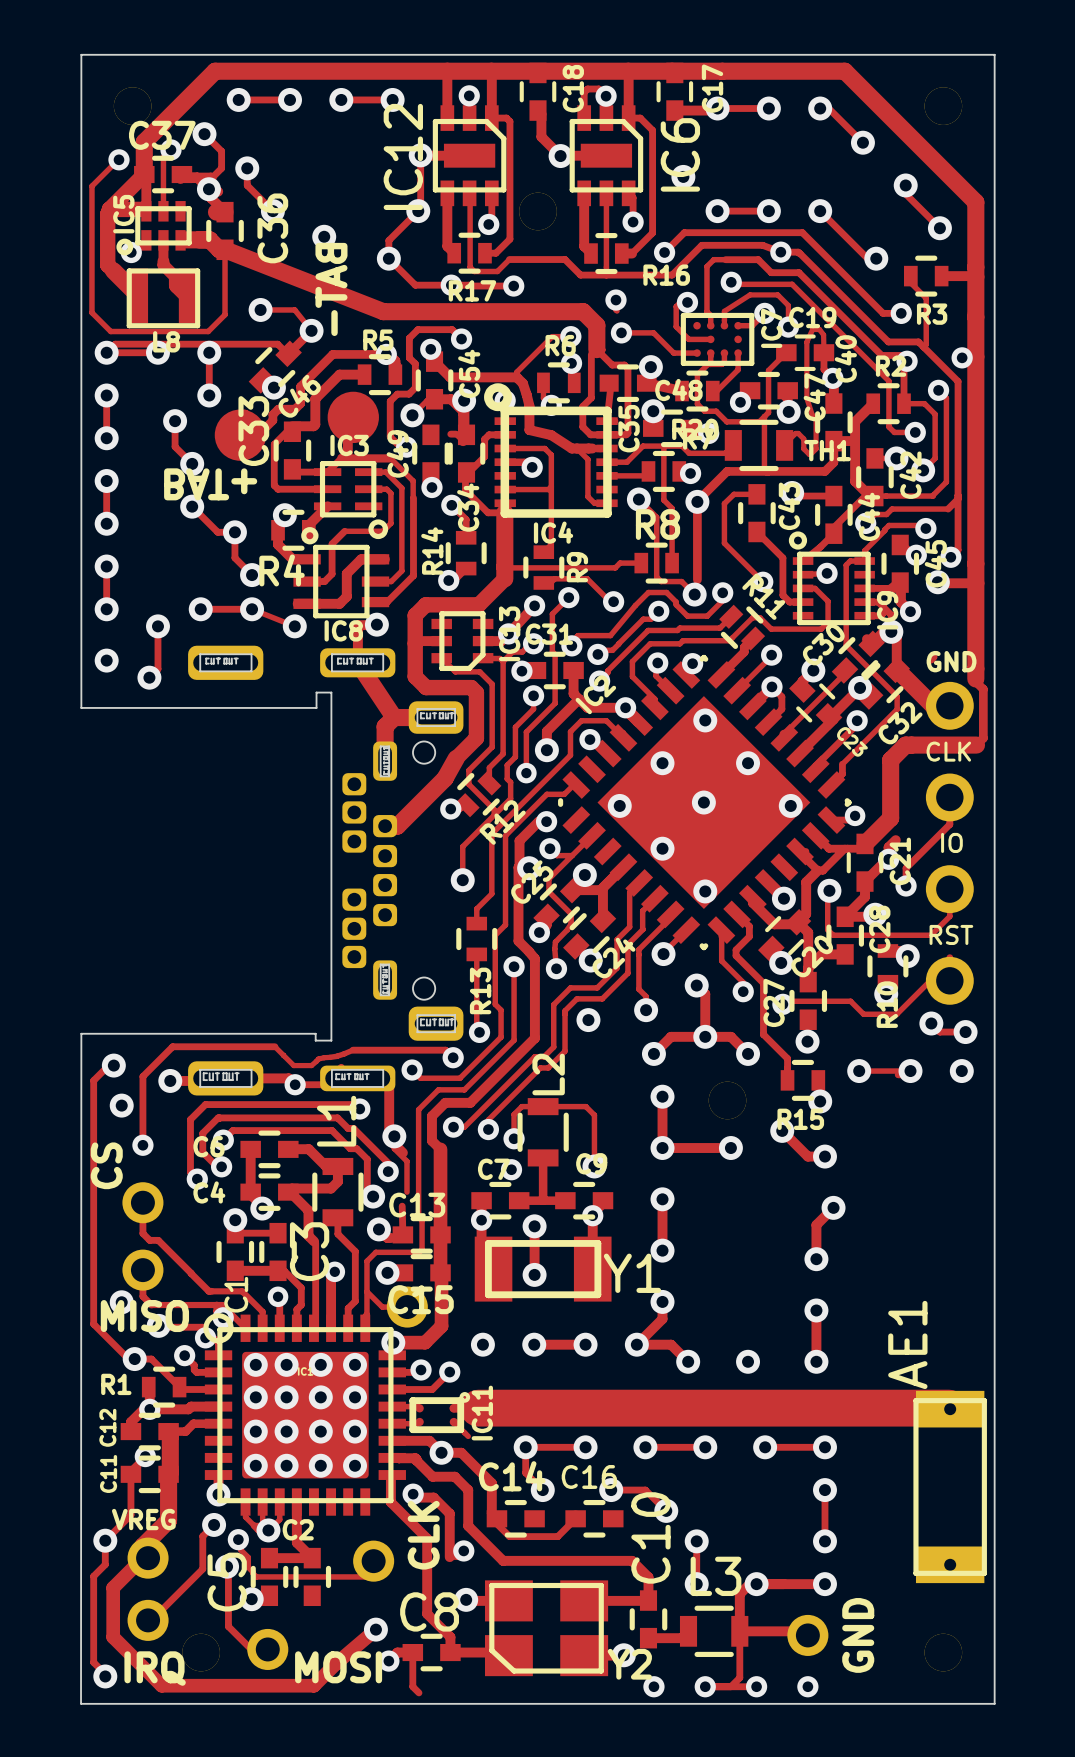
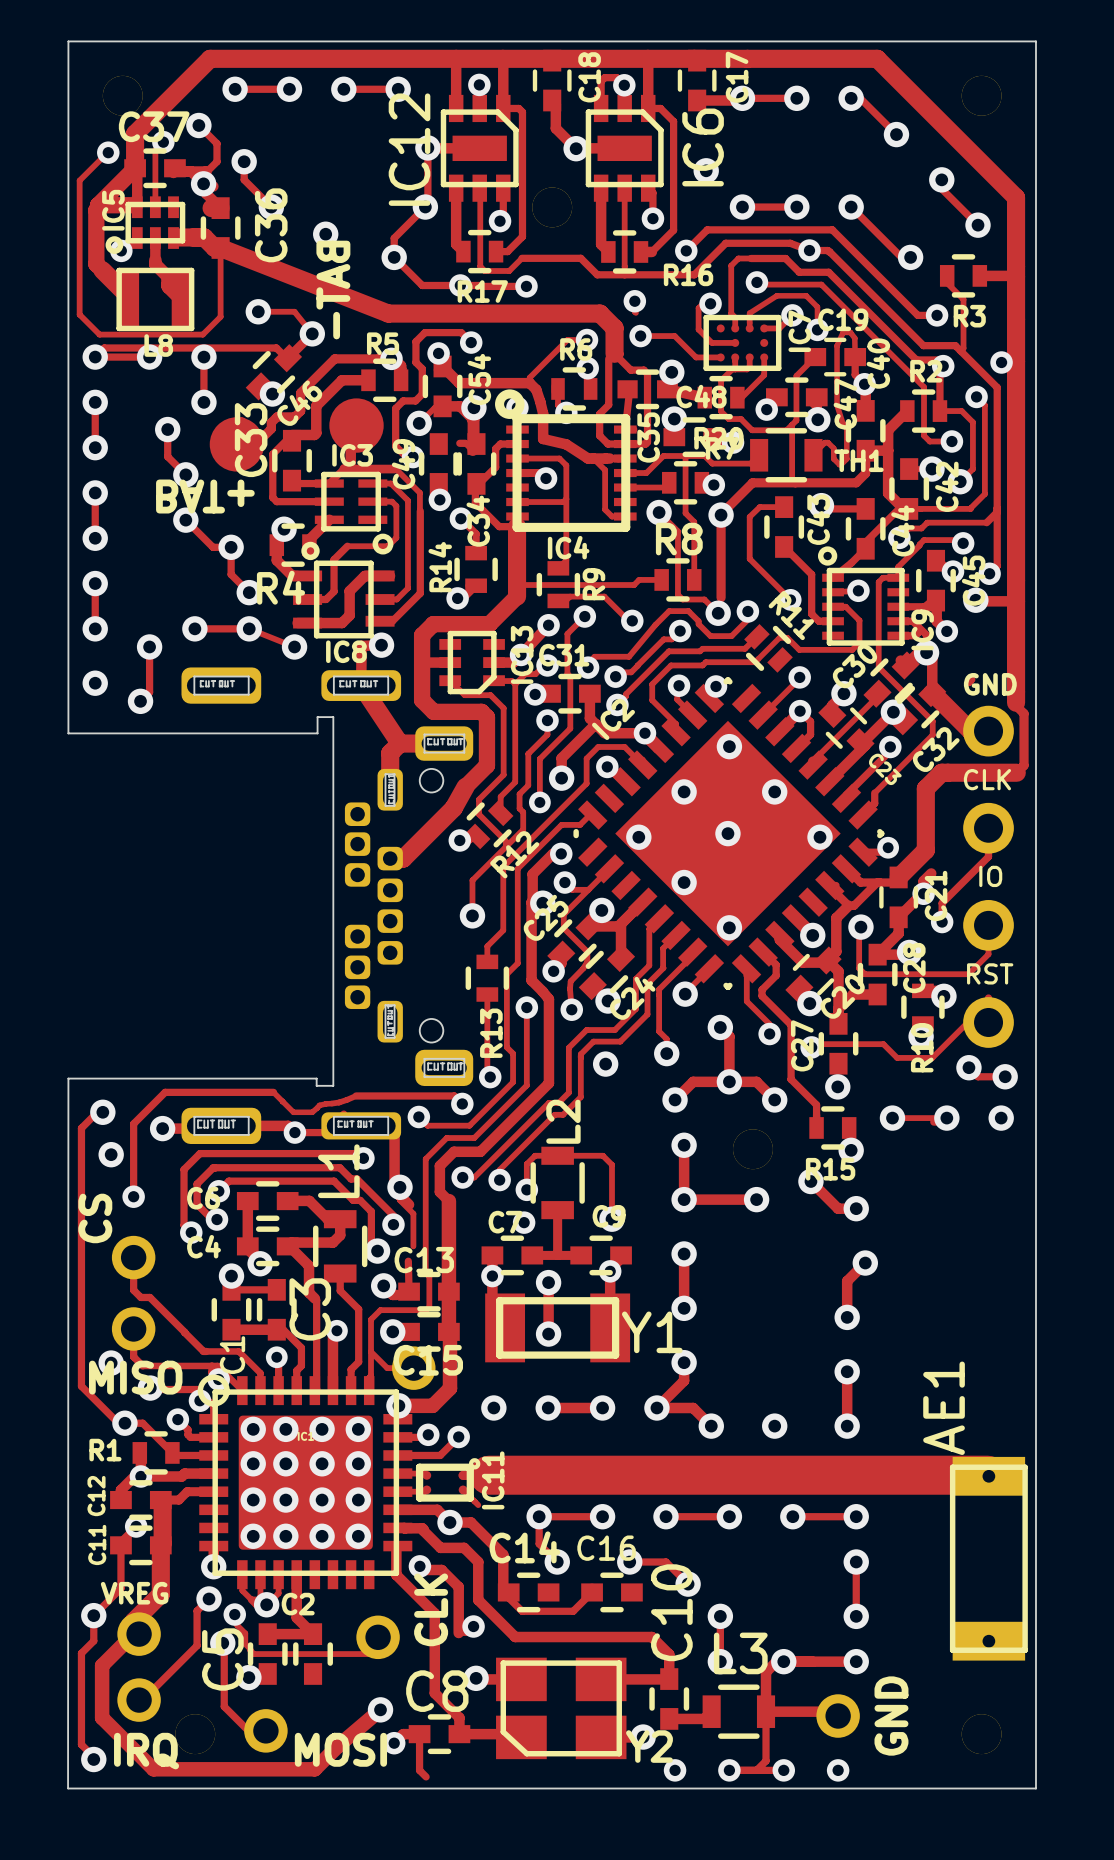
track: (753, 638) (744, 647) (744, 652) (721, 674) -> none

